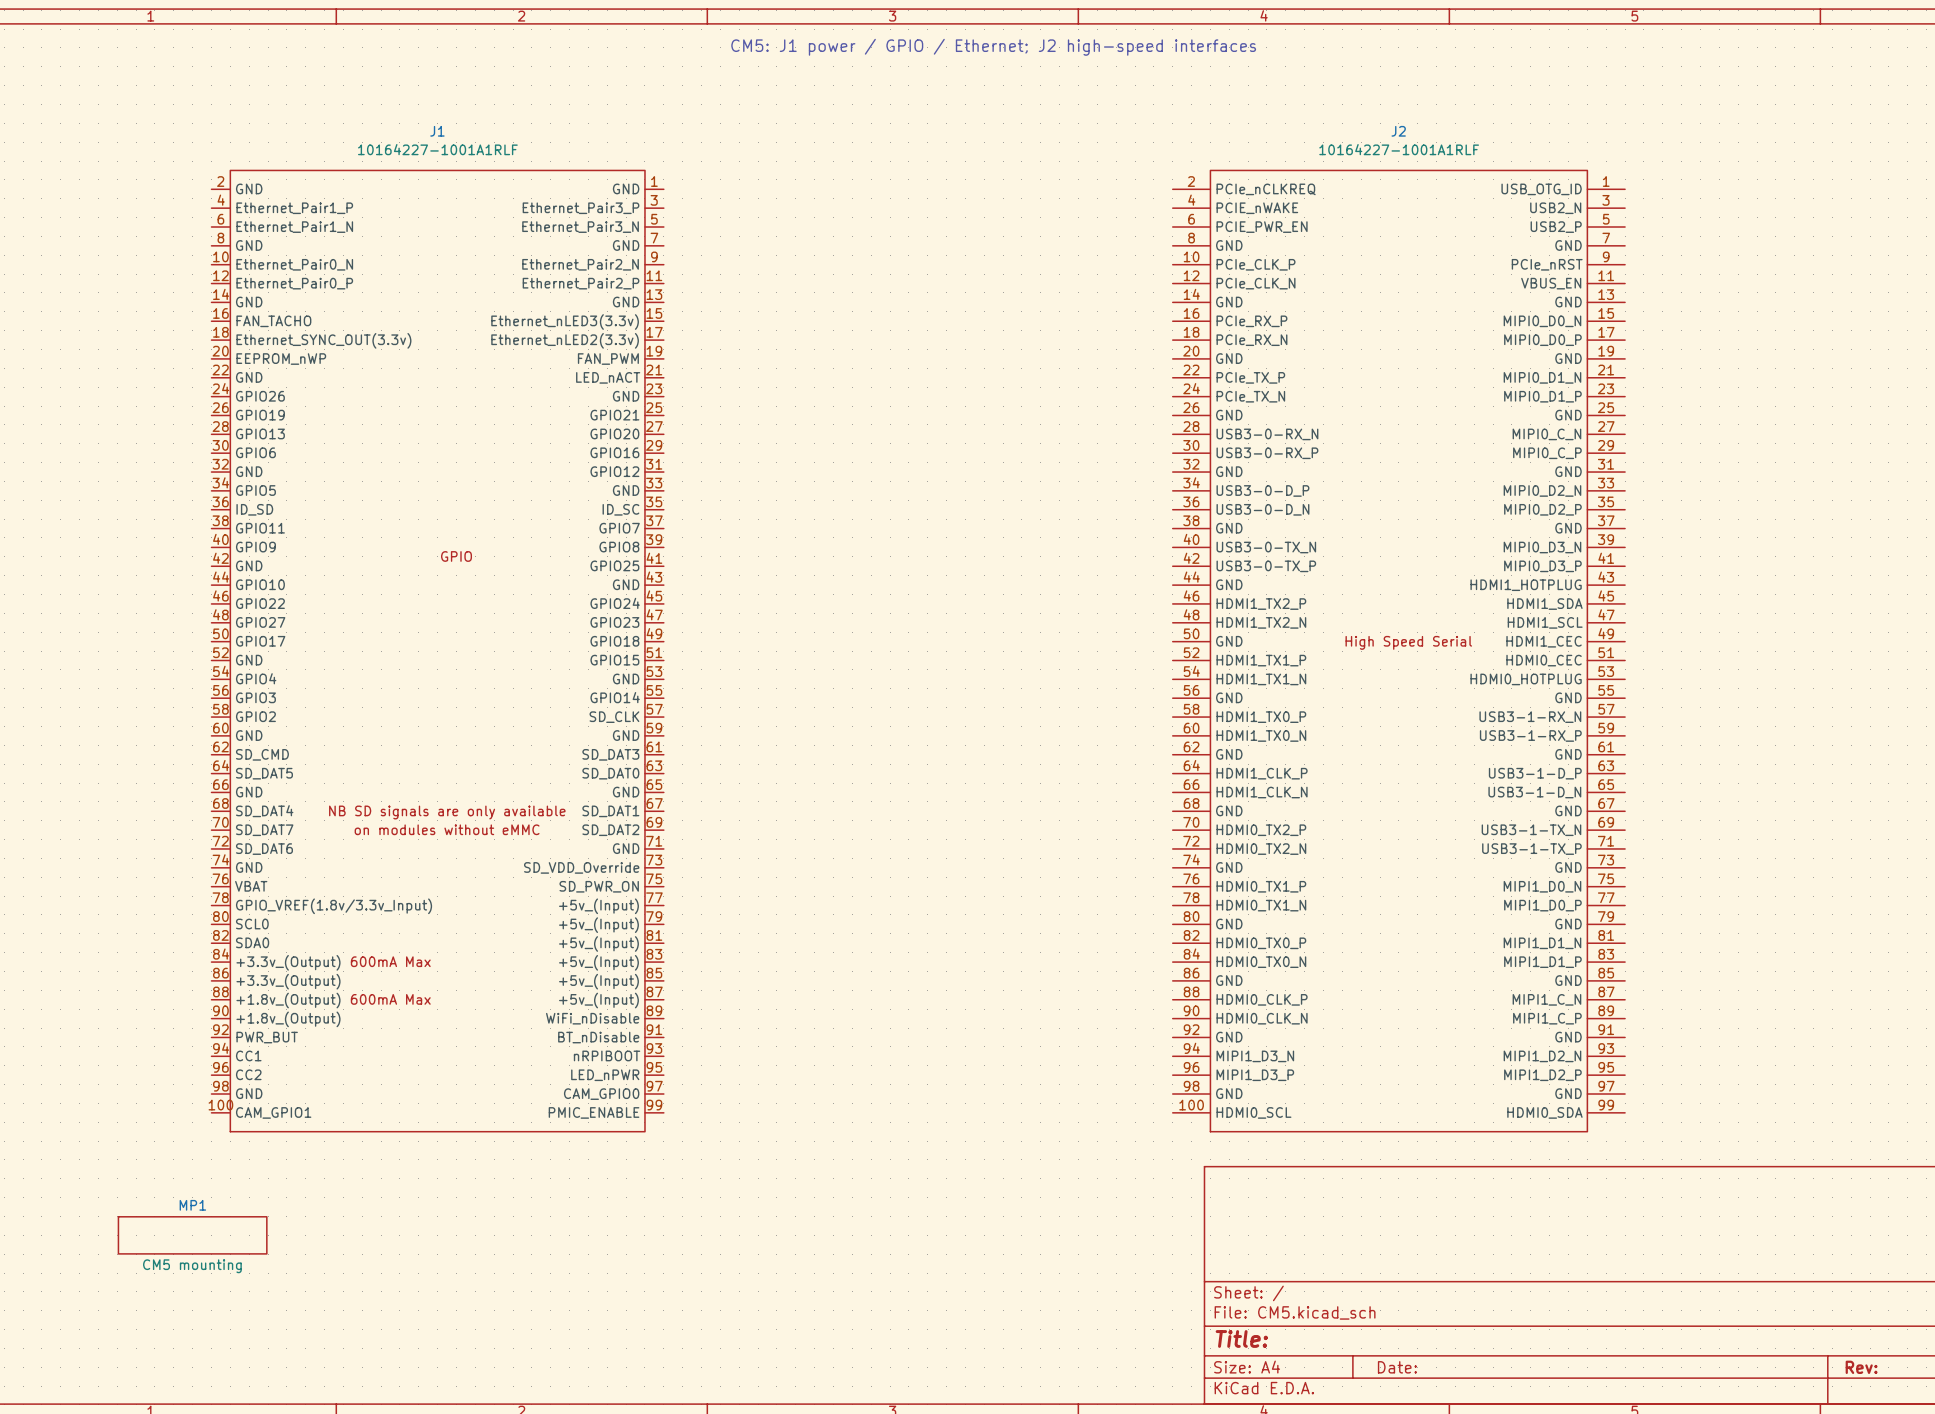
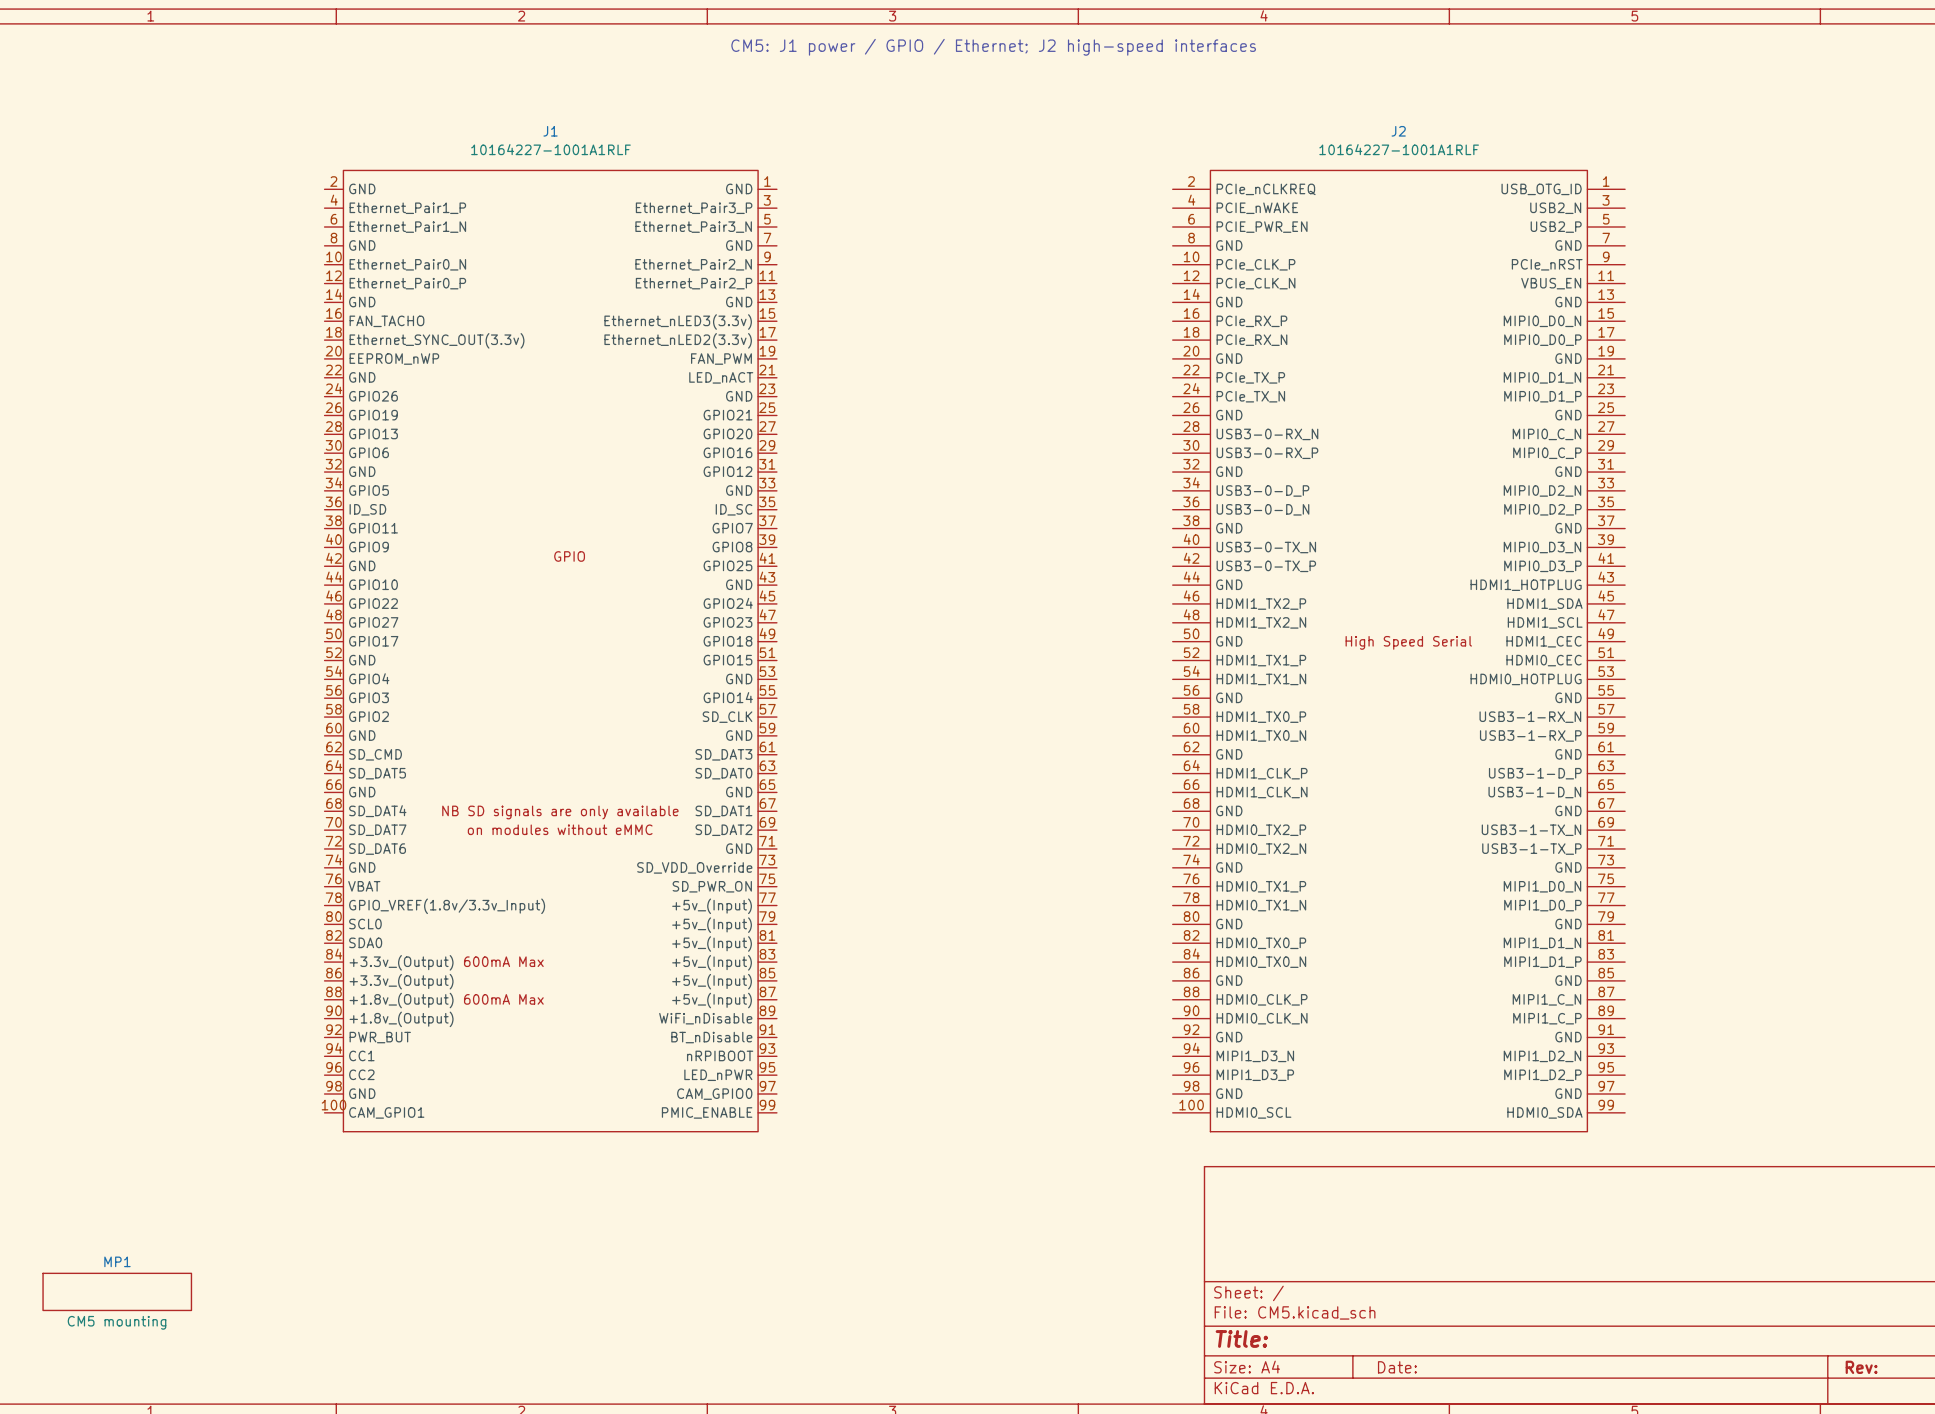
J1 position: (437, 651) -> (550, 651)
MP1 position: (192, 1235) -> (117, 1291)

